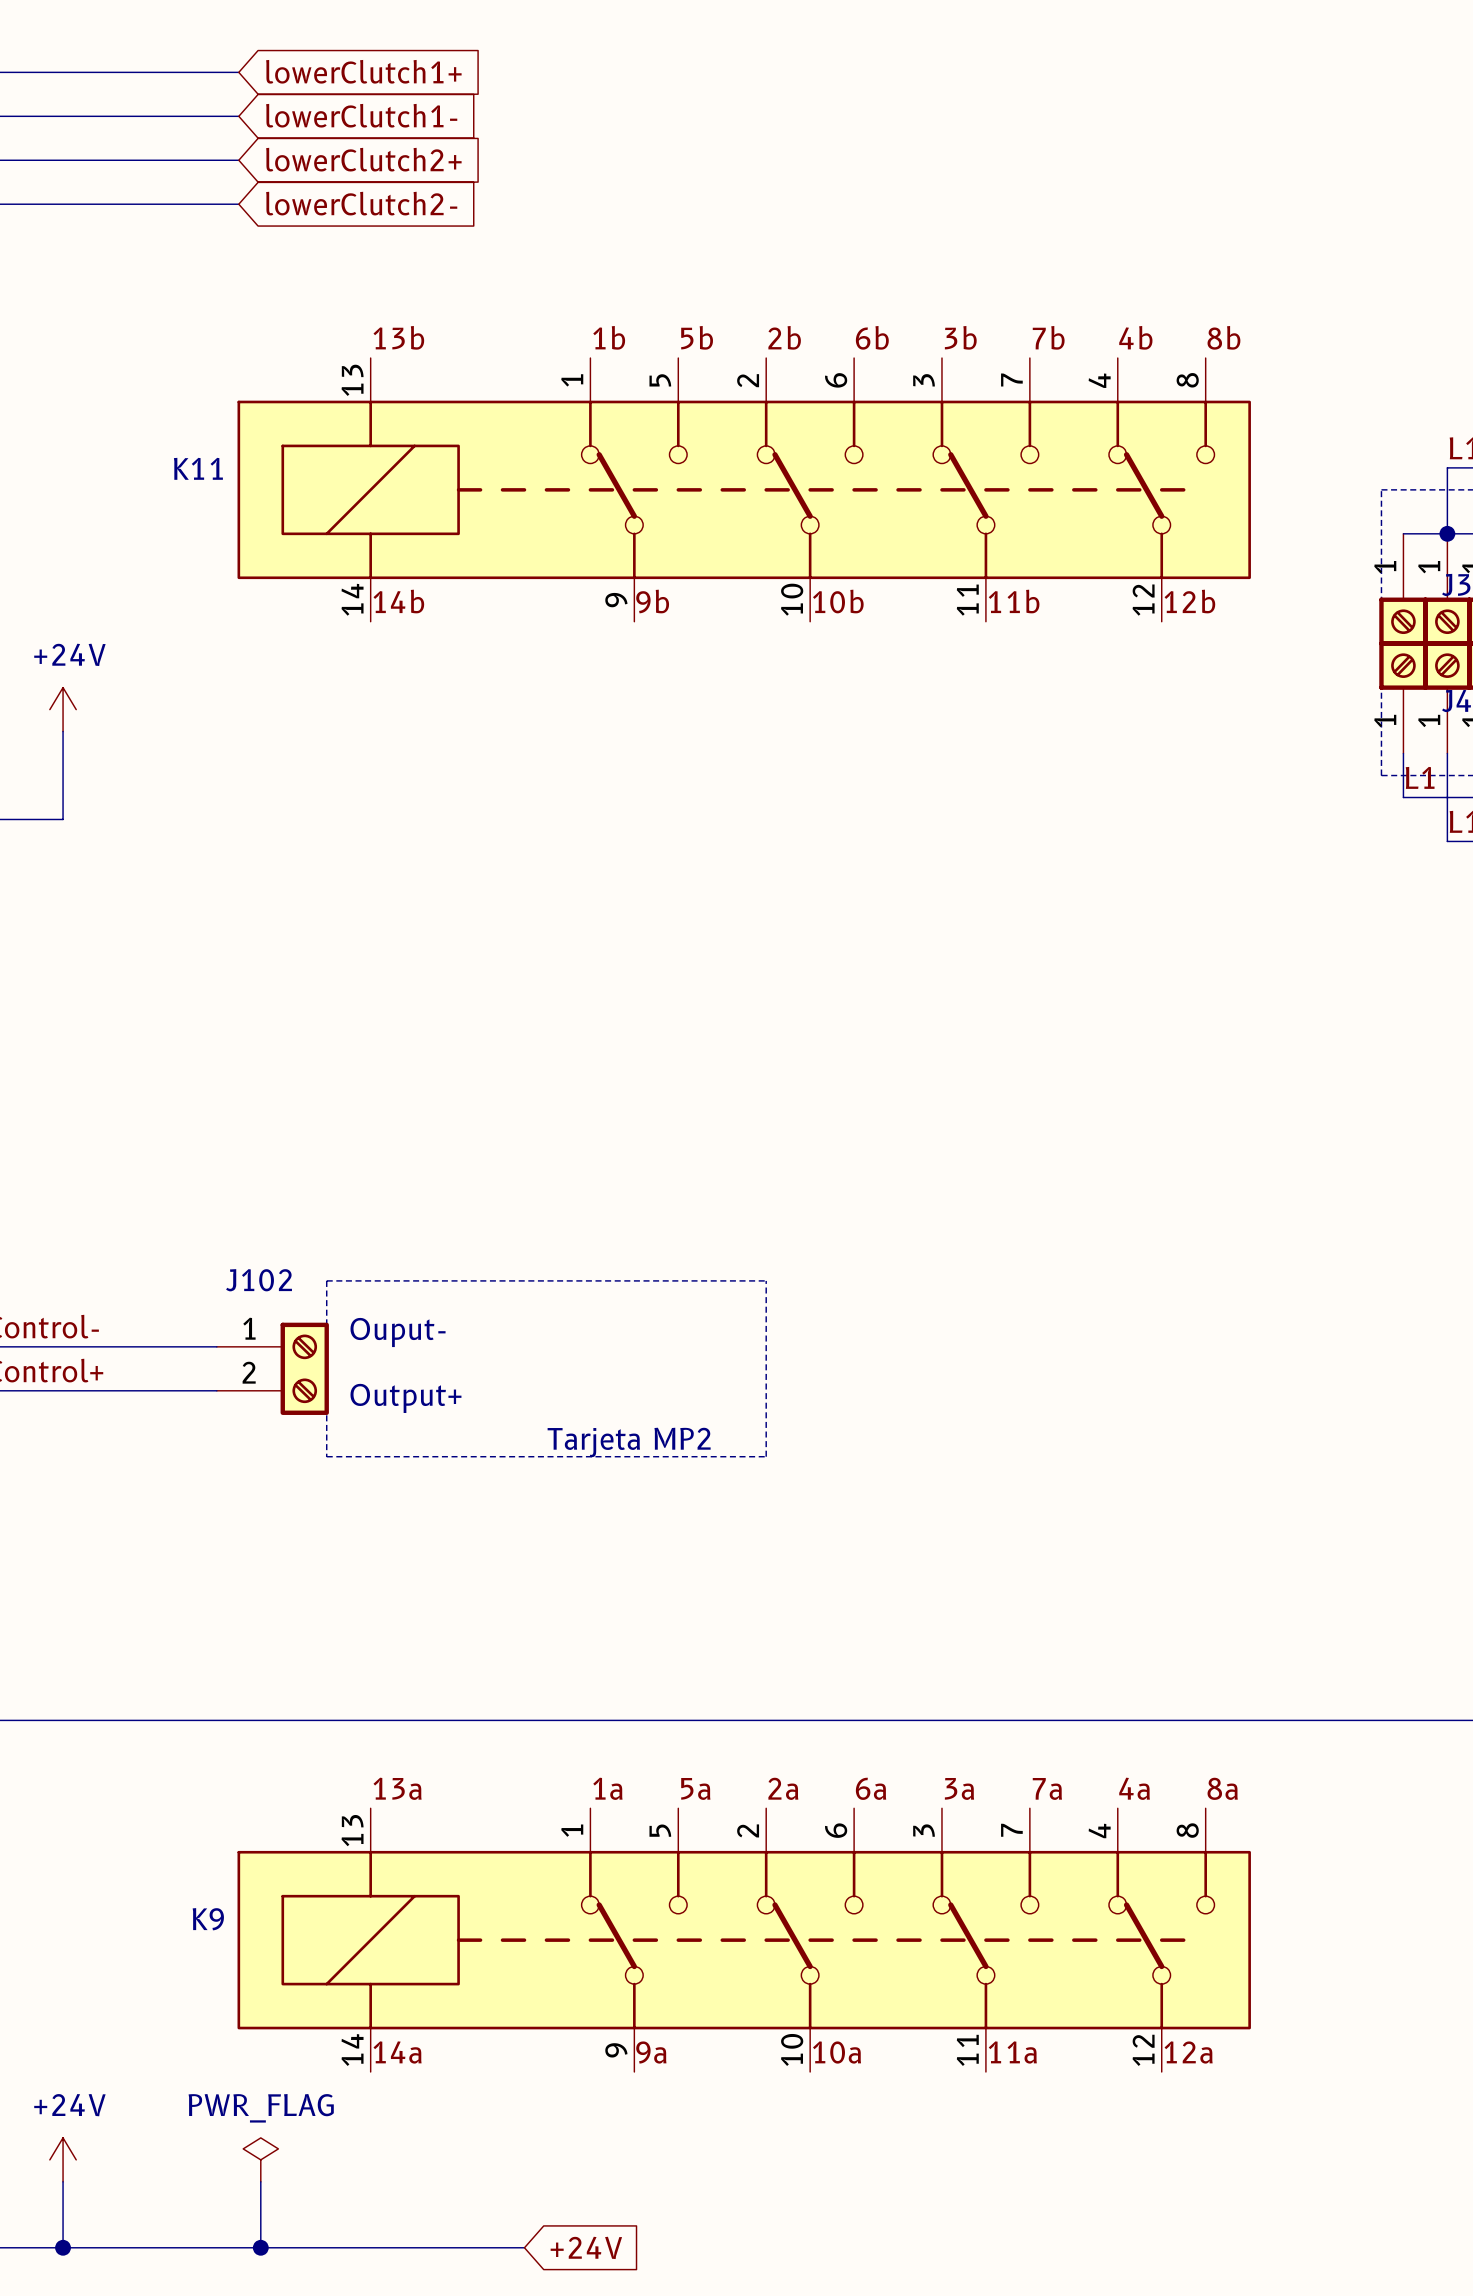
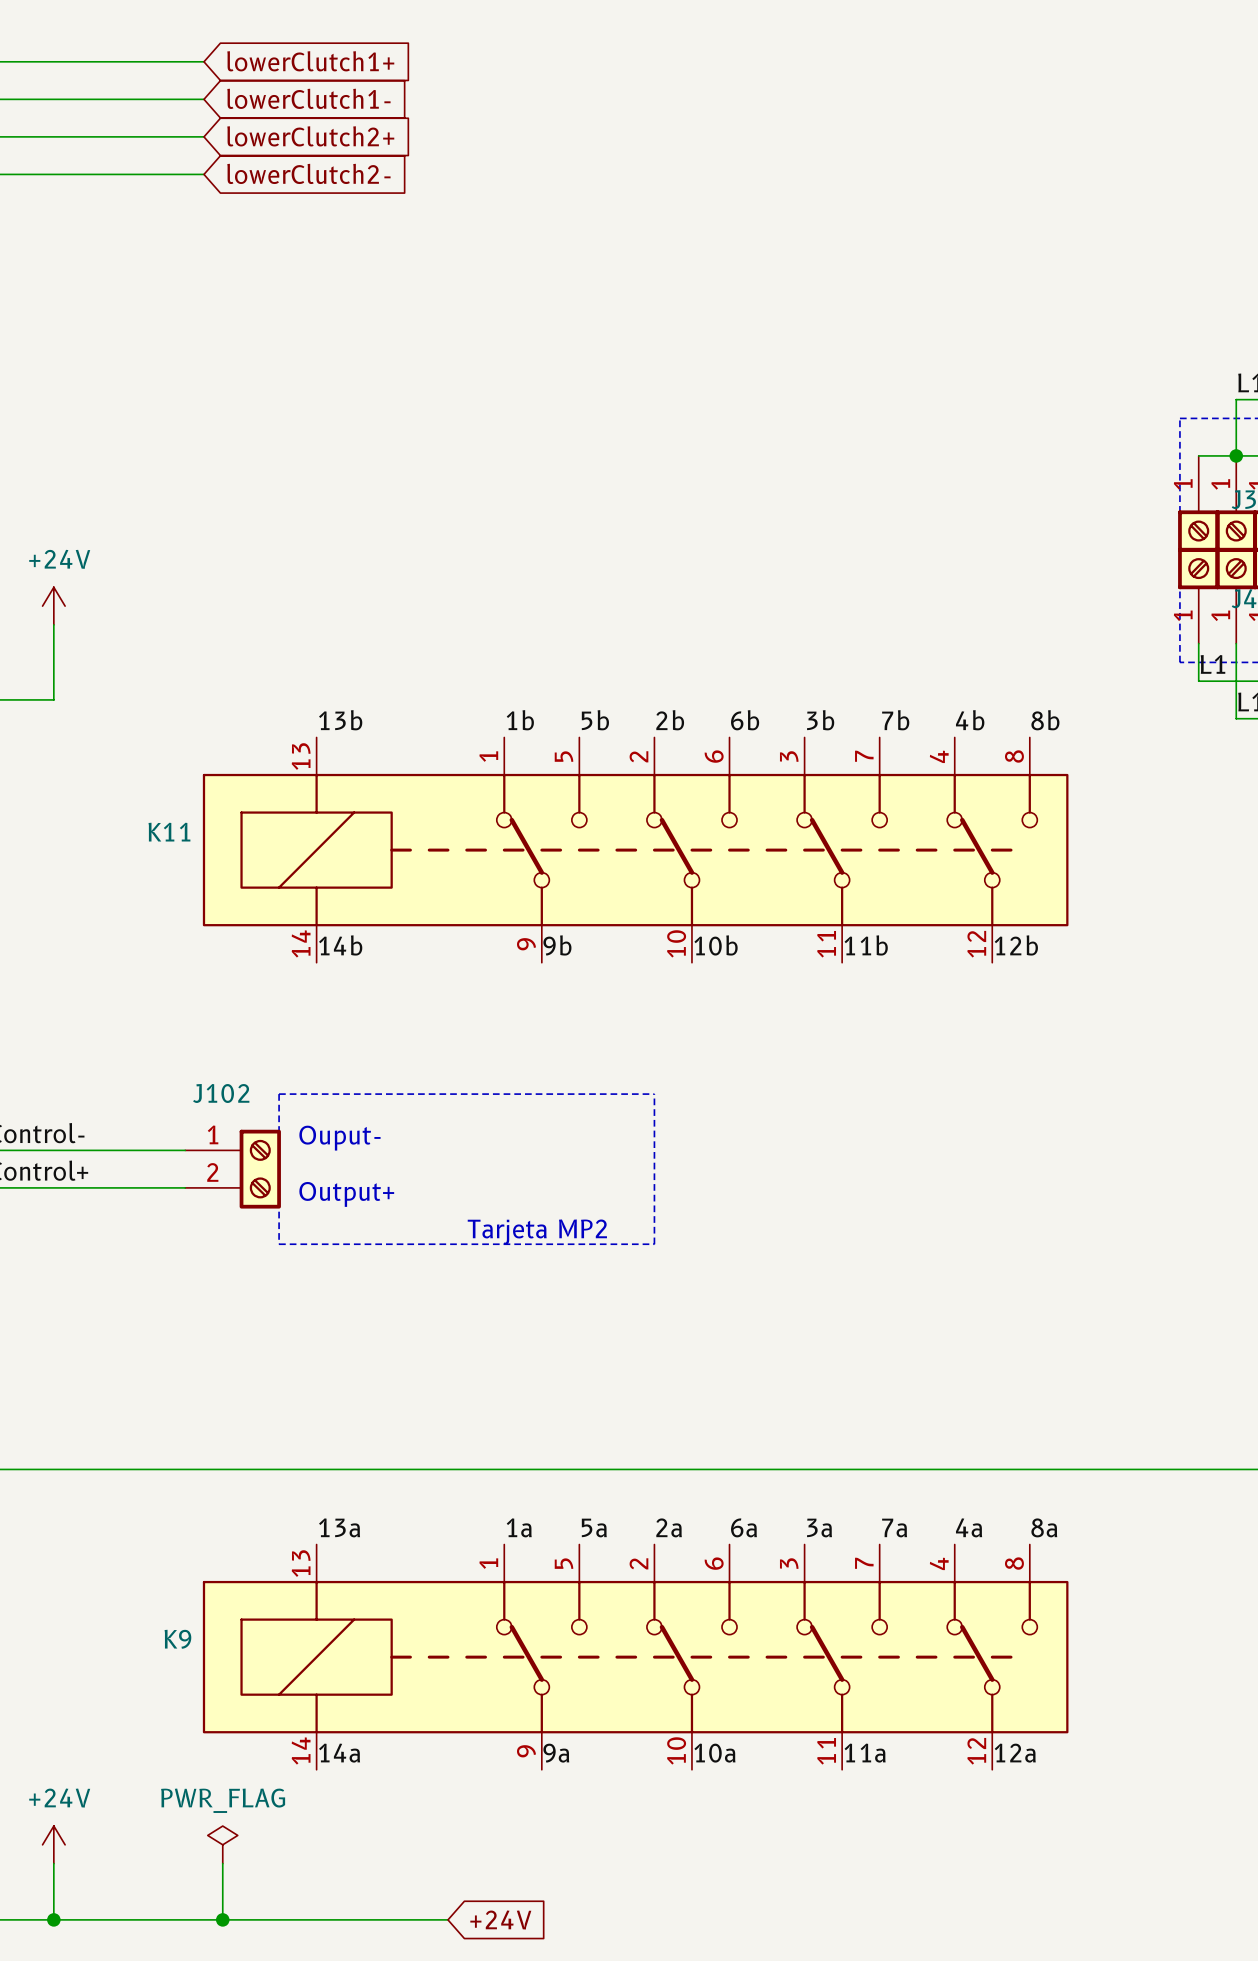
label: 13b (398, 337) -> none
label: 1b (609, 337) -> none
label: 5b (697, 337) -> none
label: 2b (784, 337) -> none
label: 6b (872, 337) -> none
label: 3b (960, 337) -> none
label: 7b (1048, 337) -> none
label: 4b (1135, 337) -> none
label: 8b (1223, 337) -> none
K11 position: (744, 489) -> (635, 850)
label: 14b (398, 601) -> none
label: 9b (652, 601) -> none
label: 10b (838, 601) -> none
label: 11b (1014, 601) -> none
label: 12b (1189, 601) -> none
label: none -> 13b (340, 720)
label: none -> 1b (520, 720)
label: none -> 5b (595, 720)
label: none -> 2b (670, 720)
label: none -> 6b (745, 720)
label: none -> 3b (820, 720)
label: none -> 7b (895, 720)
label: none -> 4b (970, 720)
label: none -> 8b (1045, 720)
label: none -> 14b (340, 945)
label: none -> 9b (557, 945)
label: none -> 10b (716, 945)
label: none -> 11b (866, 945)
label: none -> 12b (1016, 945)

